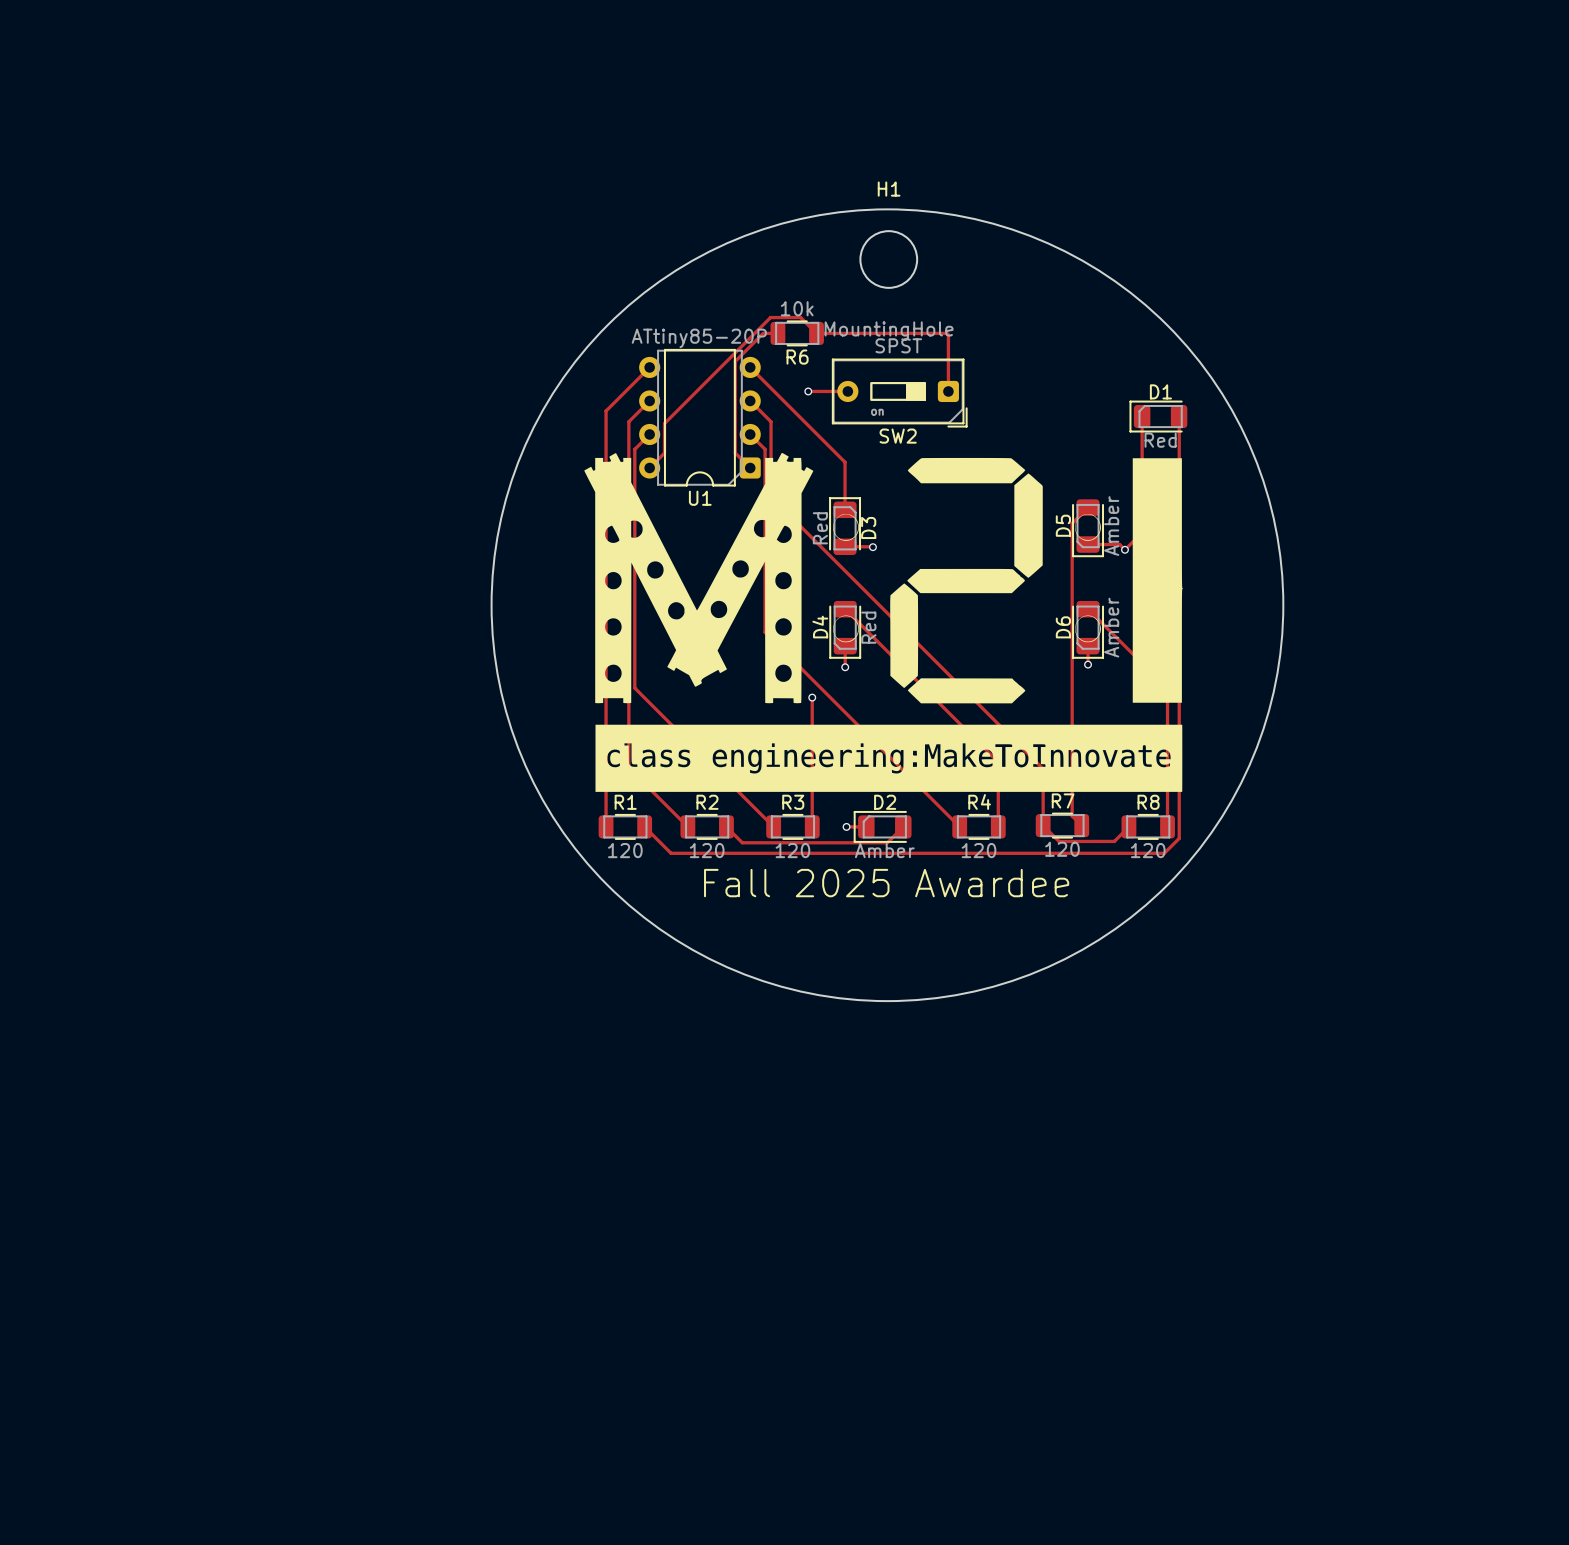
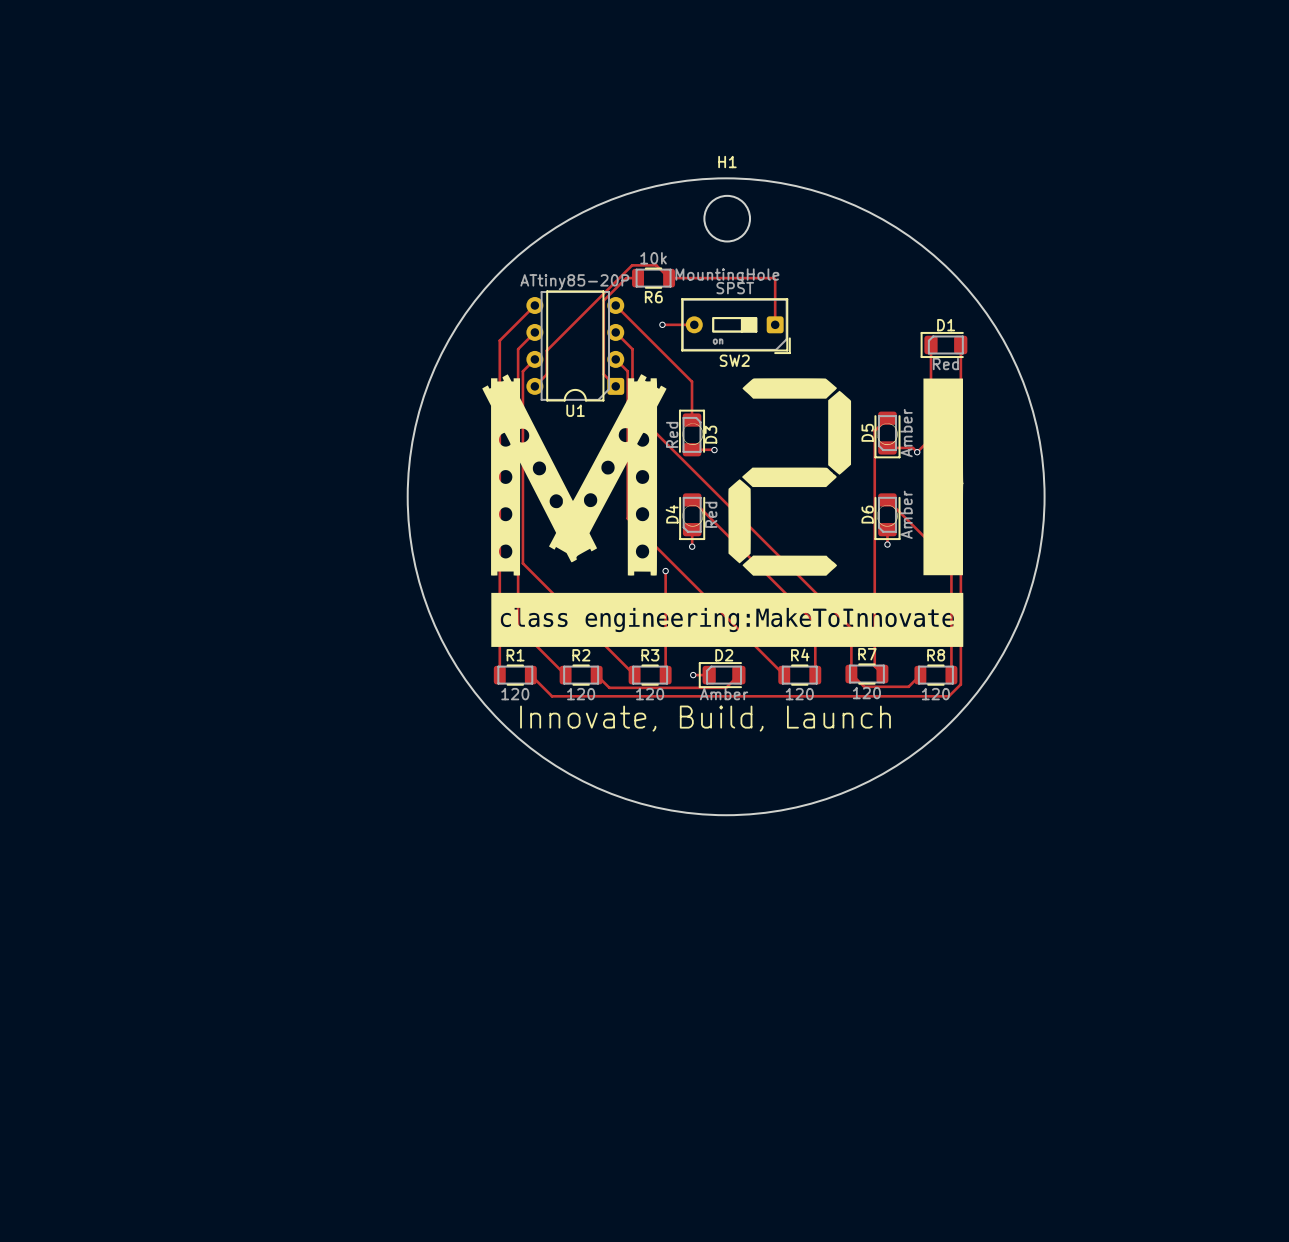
text: none -> Innovate, Build, Launch (705, 718)
text: Fall 2025 Awardee (886, 883) -> none

